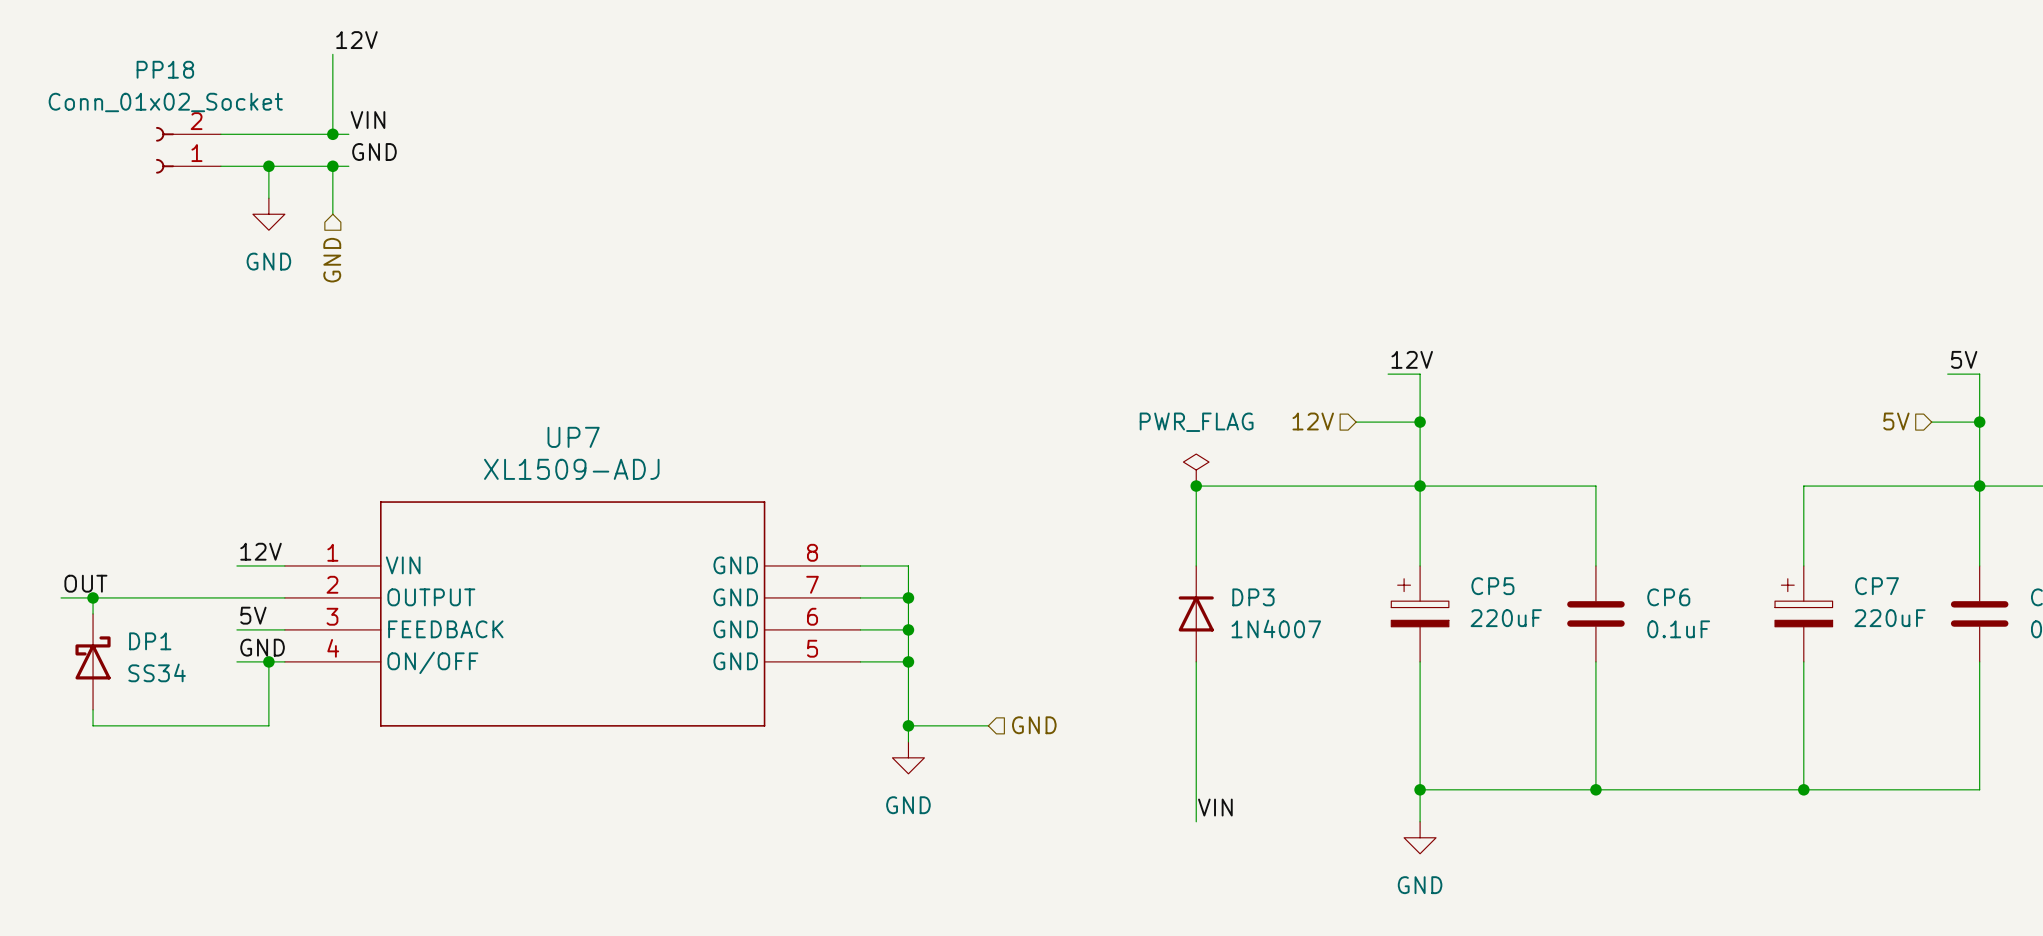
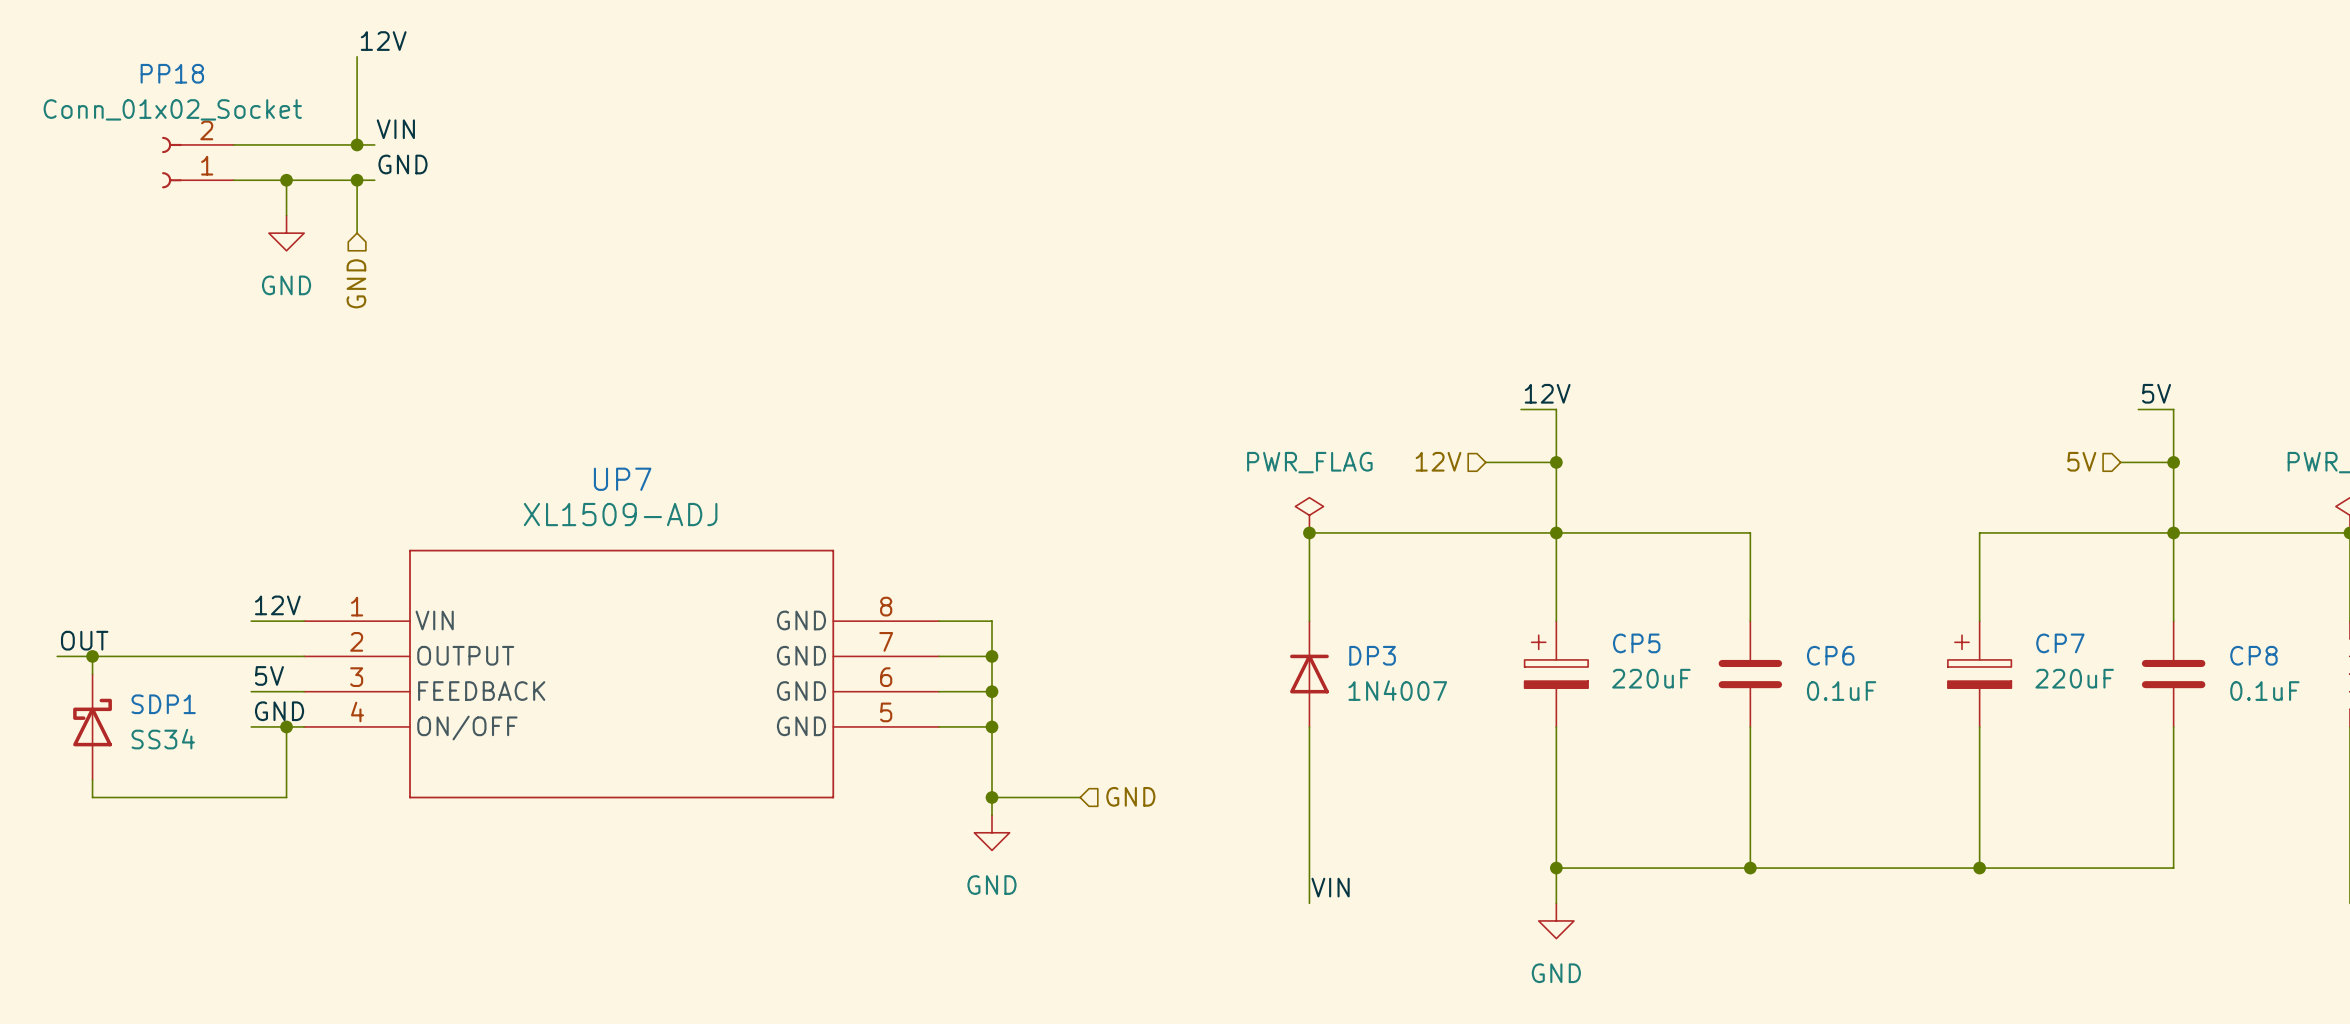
DP1 name: DP1 (150, 641) -> SDP1 (163, 704)

